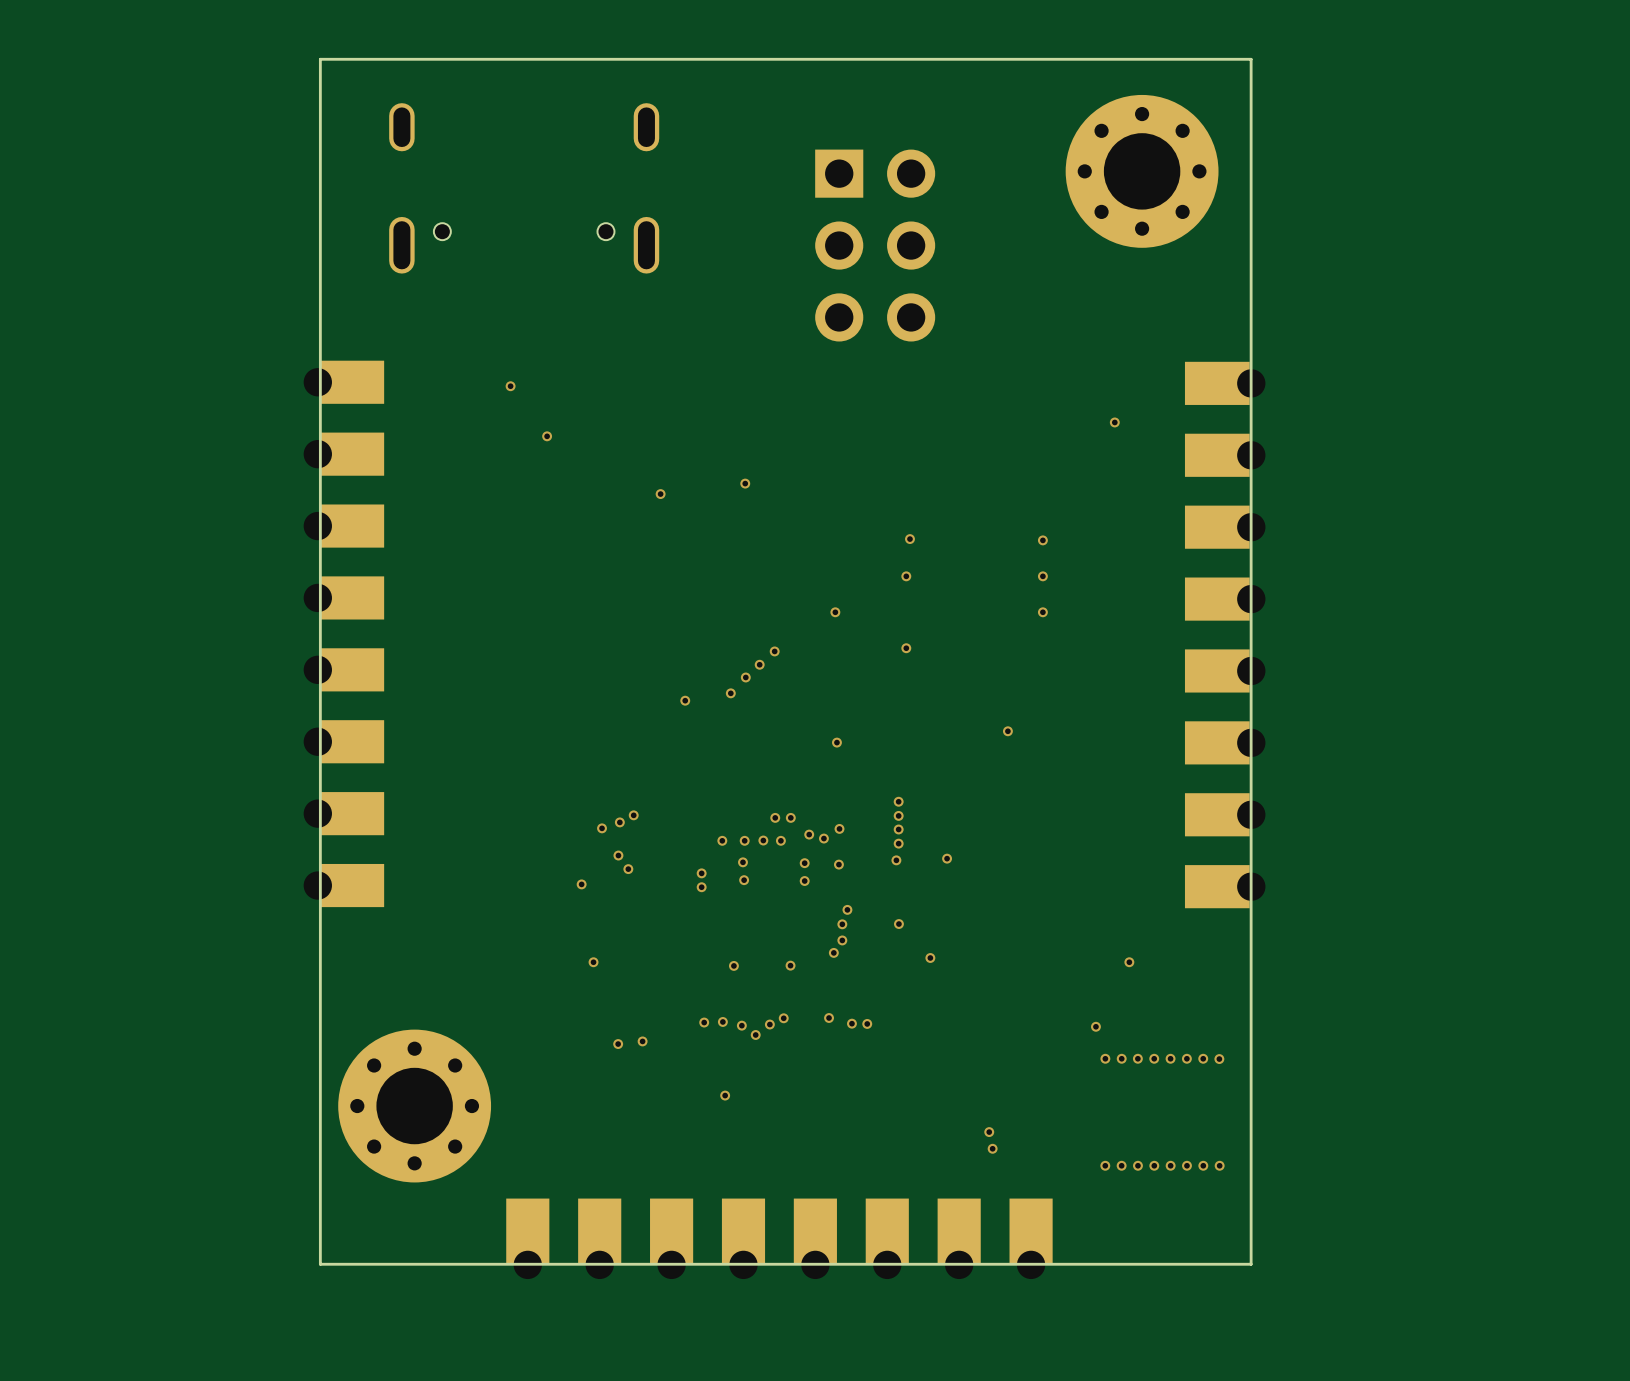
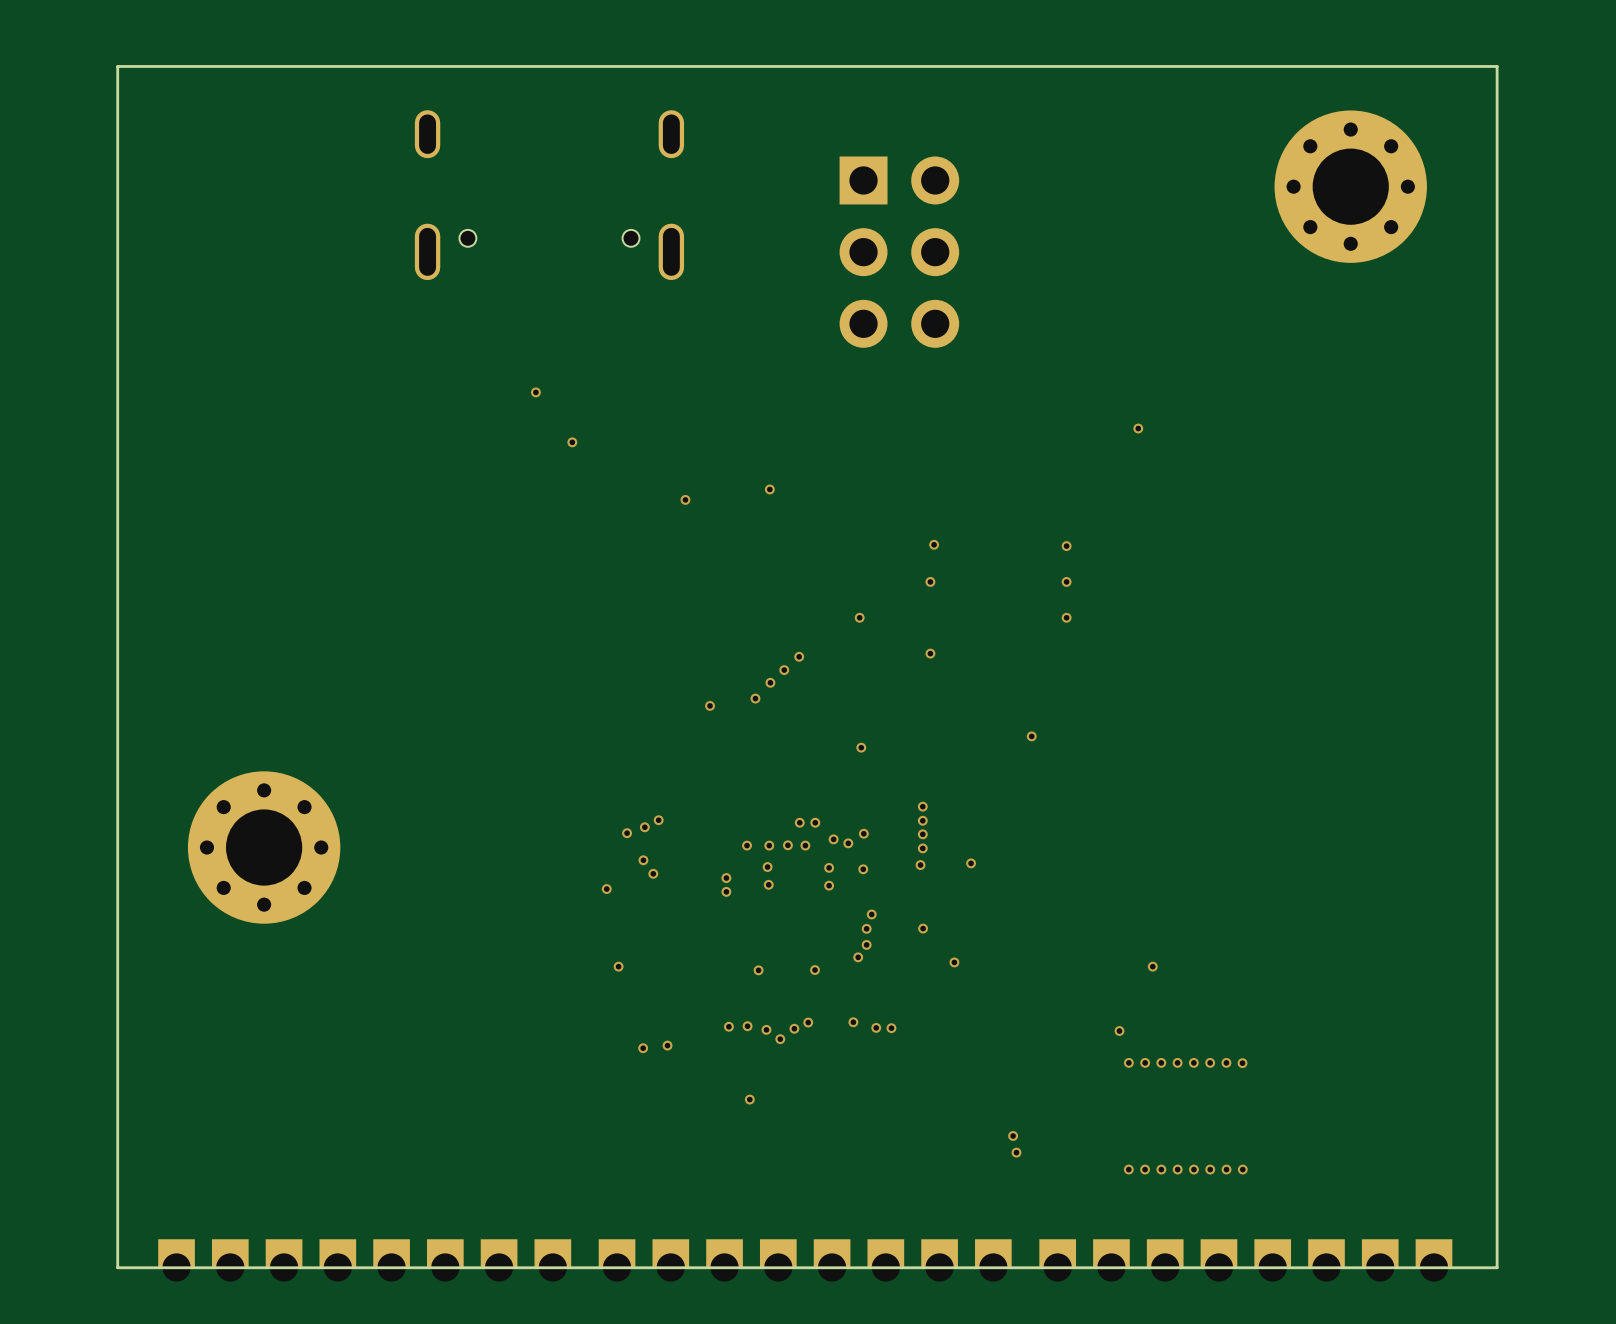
board edge: (320, 59) (320, 1264) -> (346, 66) (117, 66) (117, 1267) (346, 1267)
board edge: (1251, 59) (1251, 1264) -> (1274, 66) (1497, 66) (1497, 1267) (1274, 1267)
part position: (1142, 171) -> (1350, 186)
part: (343, 633) -> none
part: (1225, 635) -> none
part position: (414, 1106) -> (264, 847)
part footprint: [506, 1198, 1053, 1280] -> [598, 1239, 1012, 1282]
part: none -> (364, 1260)
part: none -> (1245, 1260)

